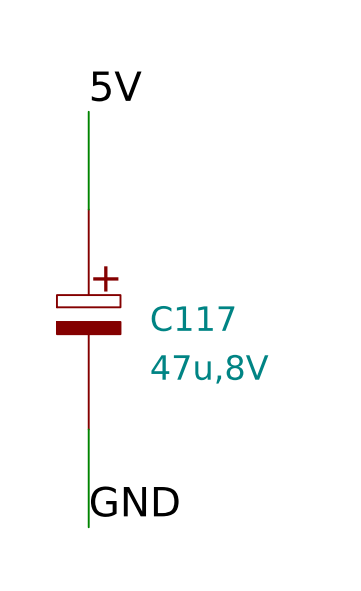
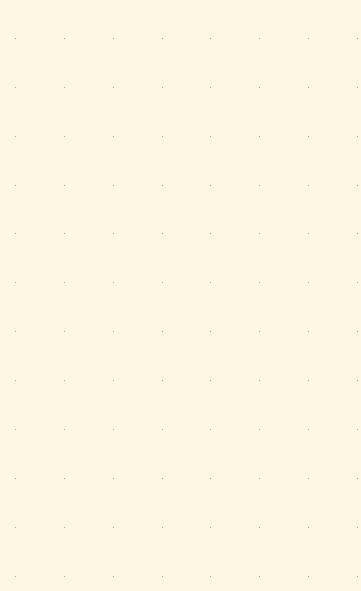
label: 5V (116, 86) -> none
wire: (88, 111) (88, 209) -> none
C117: 47u,8V (88, 319) -> none
wire: (88, 429) (88, 527) -> none
label: GND (134, 501) -> none

